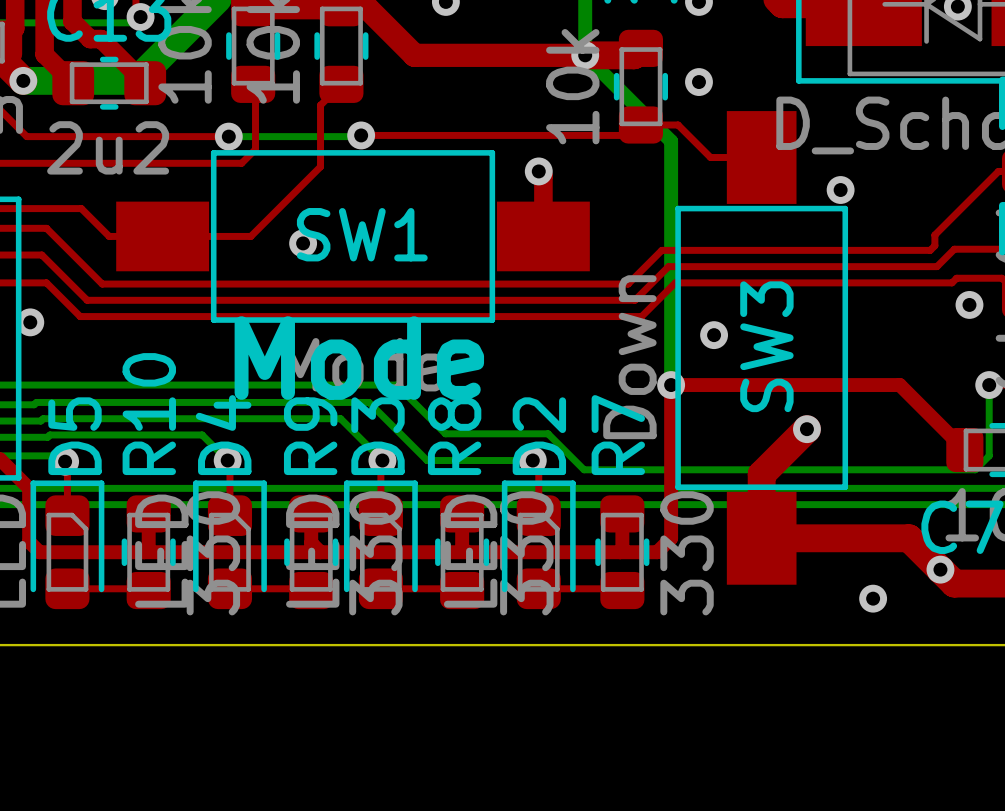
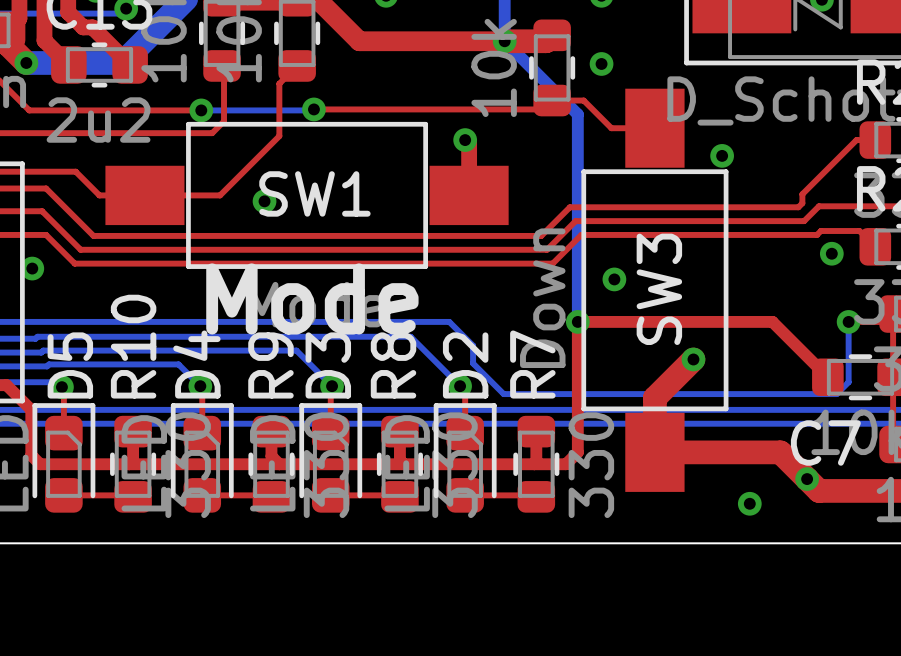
bottom track: (396, 385) (445, 433) (548, 433) -> (344, 321) (449, 321) (473, 345) (473, 363)
bottom track: (369, 402) (427, 460) (532, 460) -> (320, 336) (410, 336) (460, 386)

